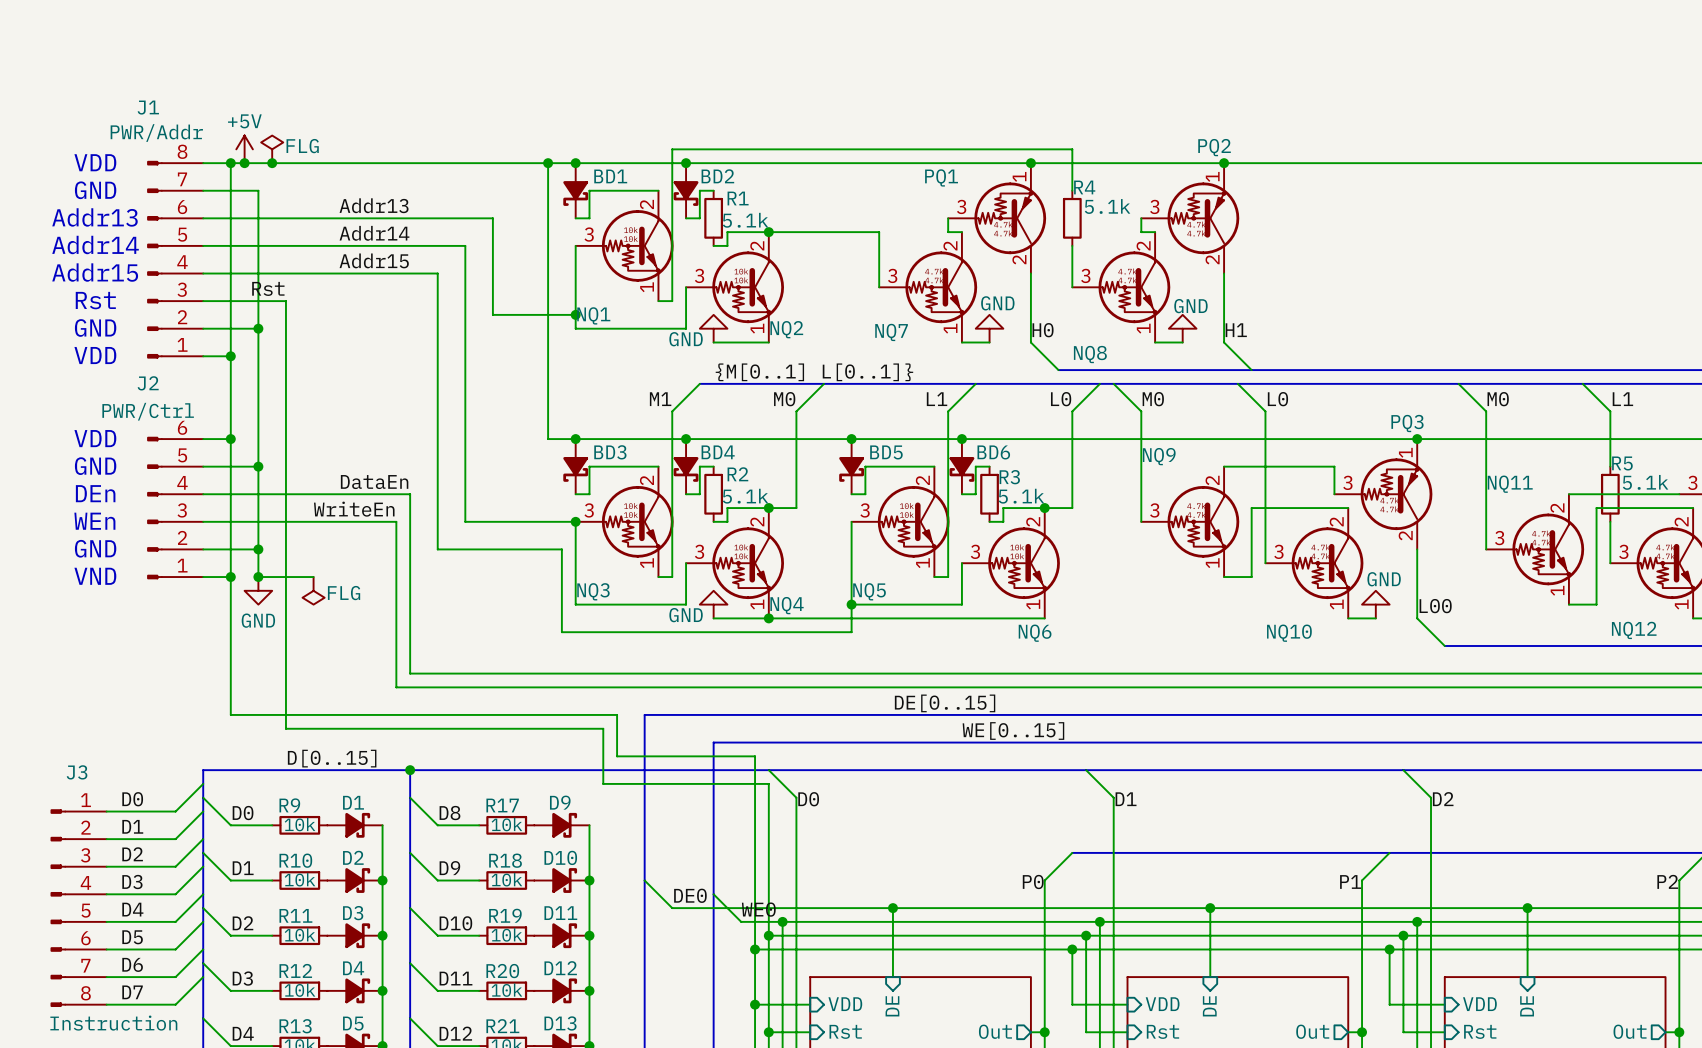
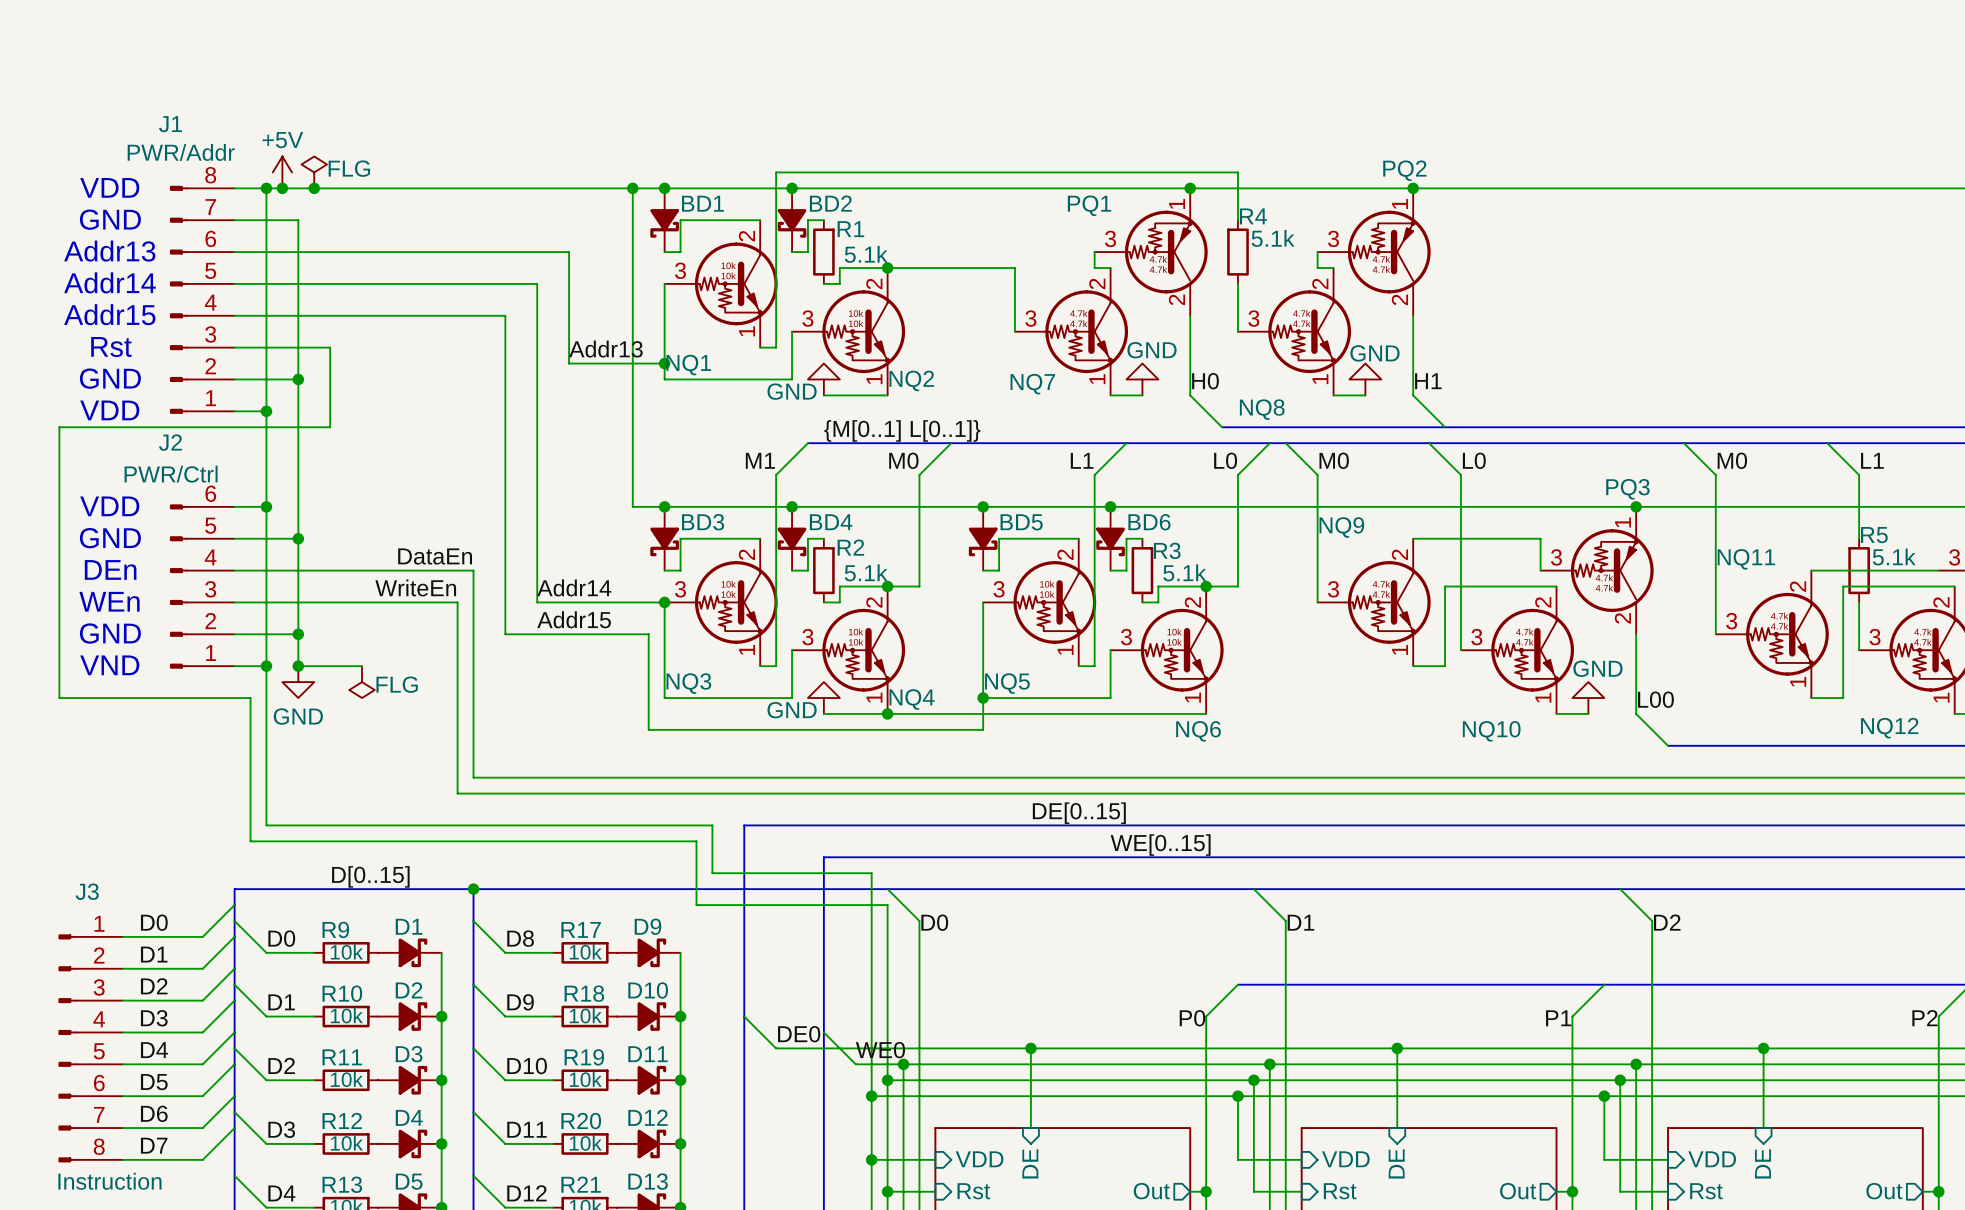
label position: Addr13 (374, 205) -> Addr13 (605, 349)
label: Addr14 (374, 233) -> none
label: Addr15 (374, 260) -> none
label: Rst (268, 288) -> none
wire: (285, 370) (285, 728) -> (330, 427) (59, 427) (59, 698) (250, 698) (250, 841) (330, 841)
label: none -> Addr14 (574, 587)
label: none -> Addr15 (574, 619)

